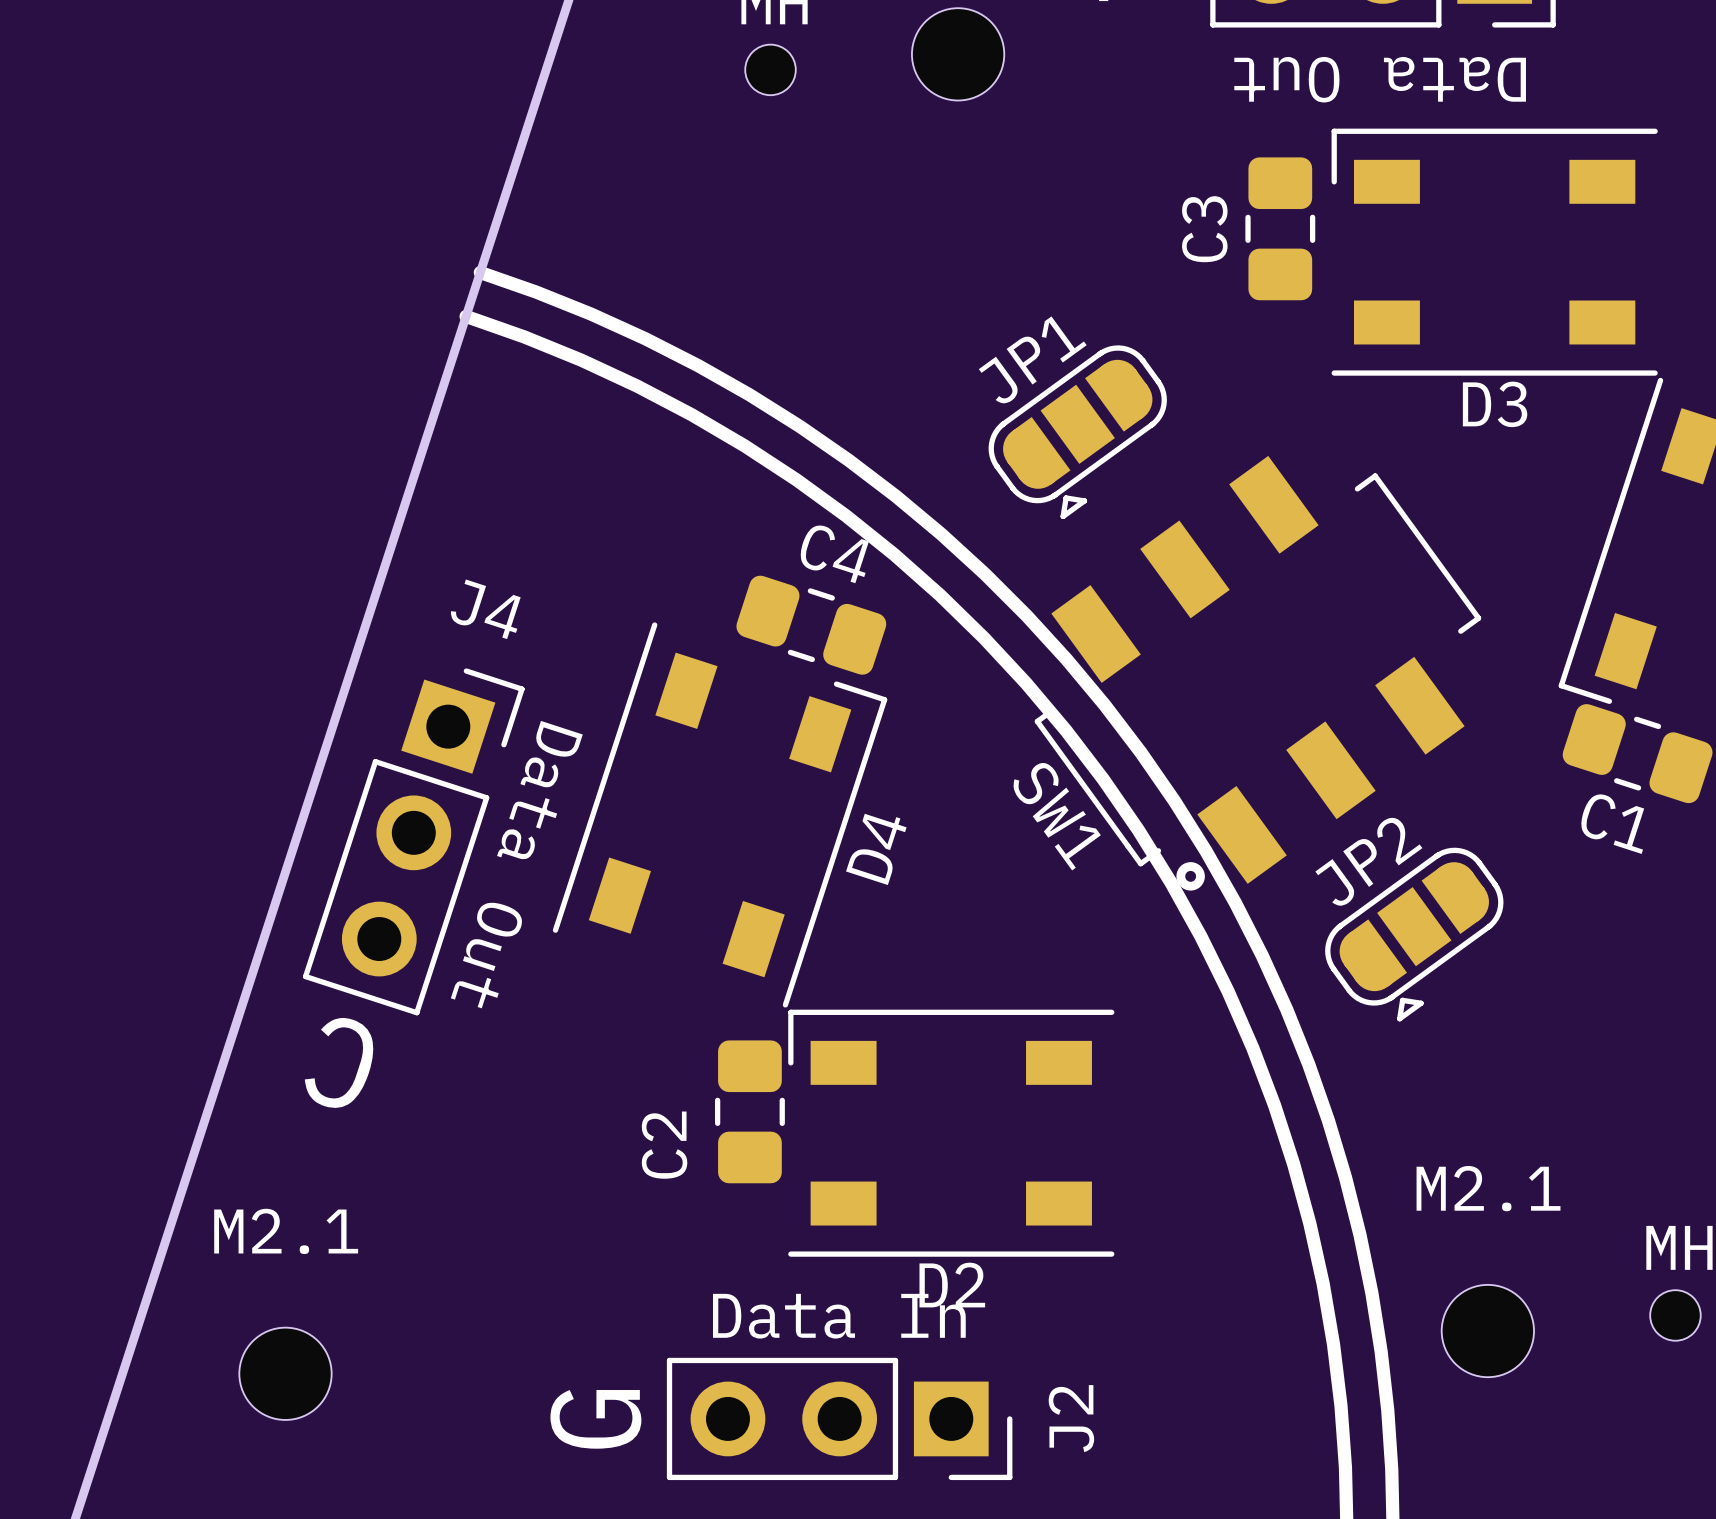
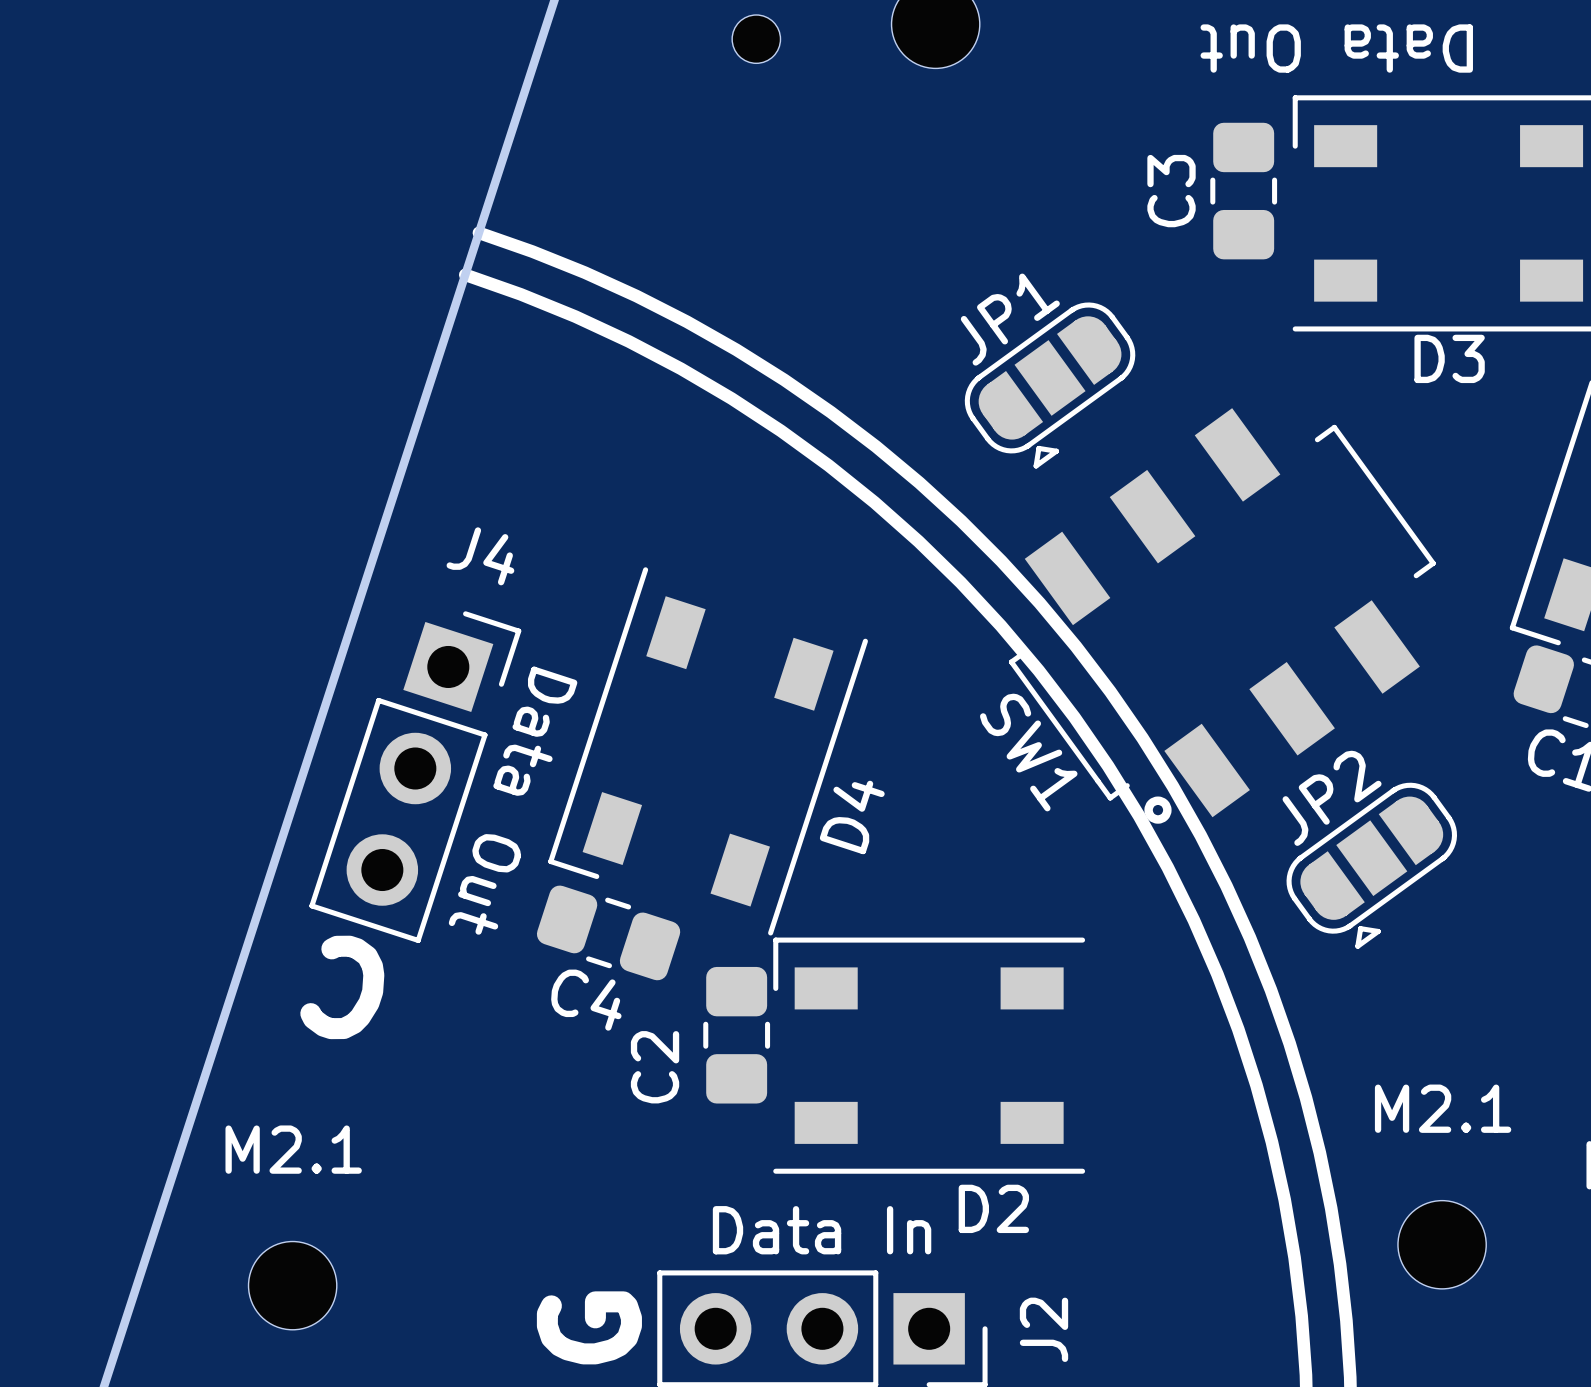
C4 name position: C4 (834, 553) -> C4 (586, 1000)
C4 position: (811, 625) -> (608, 932)
D4 rotation: 0° (720, 814) -> 180° (708, 751)
D2 name position: D2 (952, 1285) -> D2 (993, 1208)

